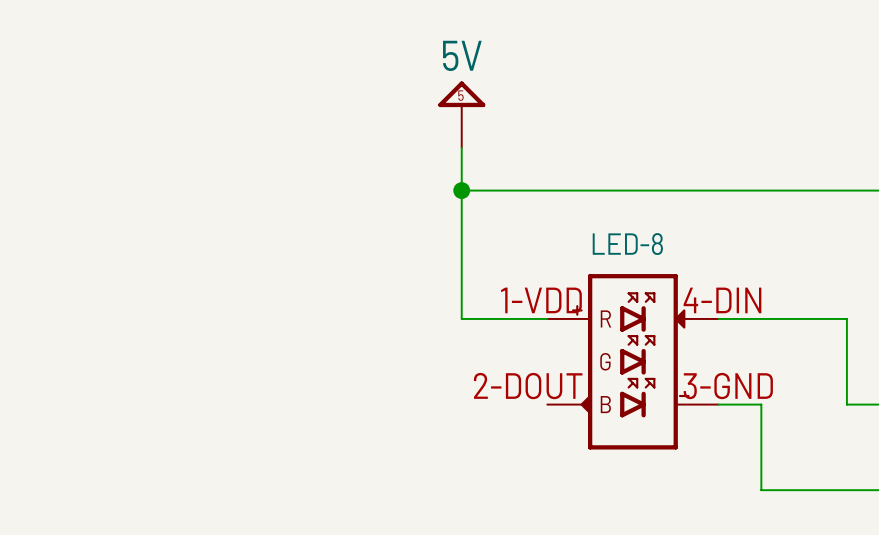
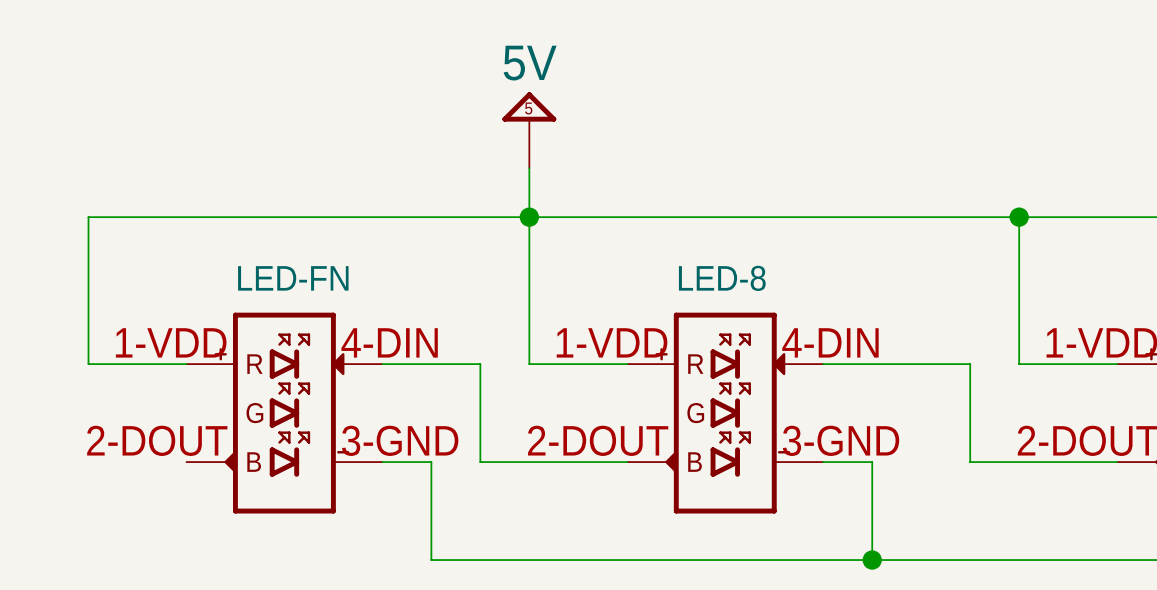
wire: none -> (529, 217) (88, 217) (88, 364) (186, 364)
wire: none -> (382, 364) (480, 364) (480, 462) (627, 462)
LED-FN: none -> (284, 413)
wire: none -> (382, 462) (431, 462) (431, 560) (872, 560)
junction: none -> (872, 560)

